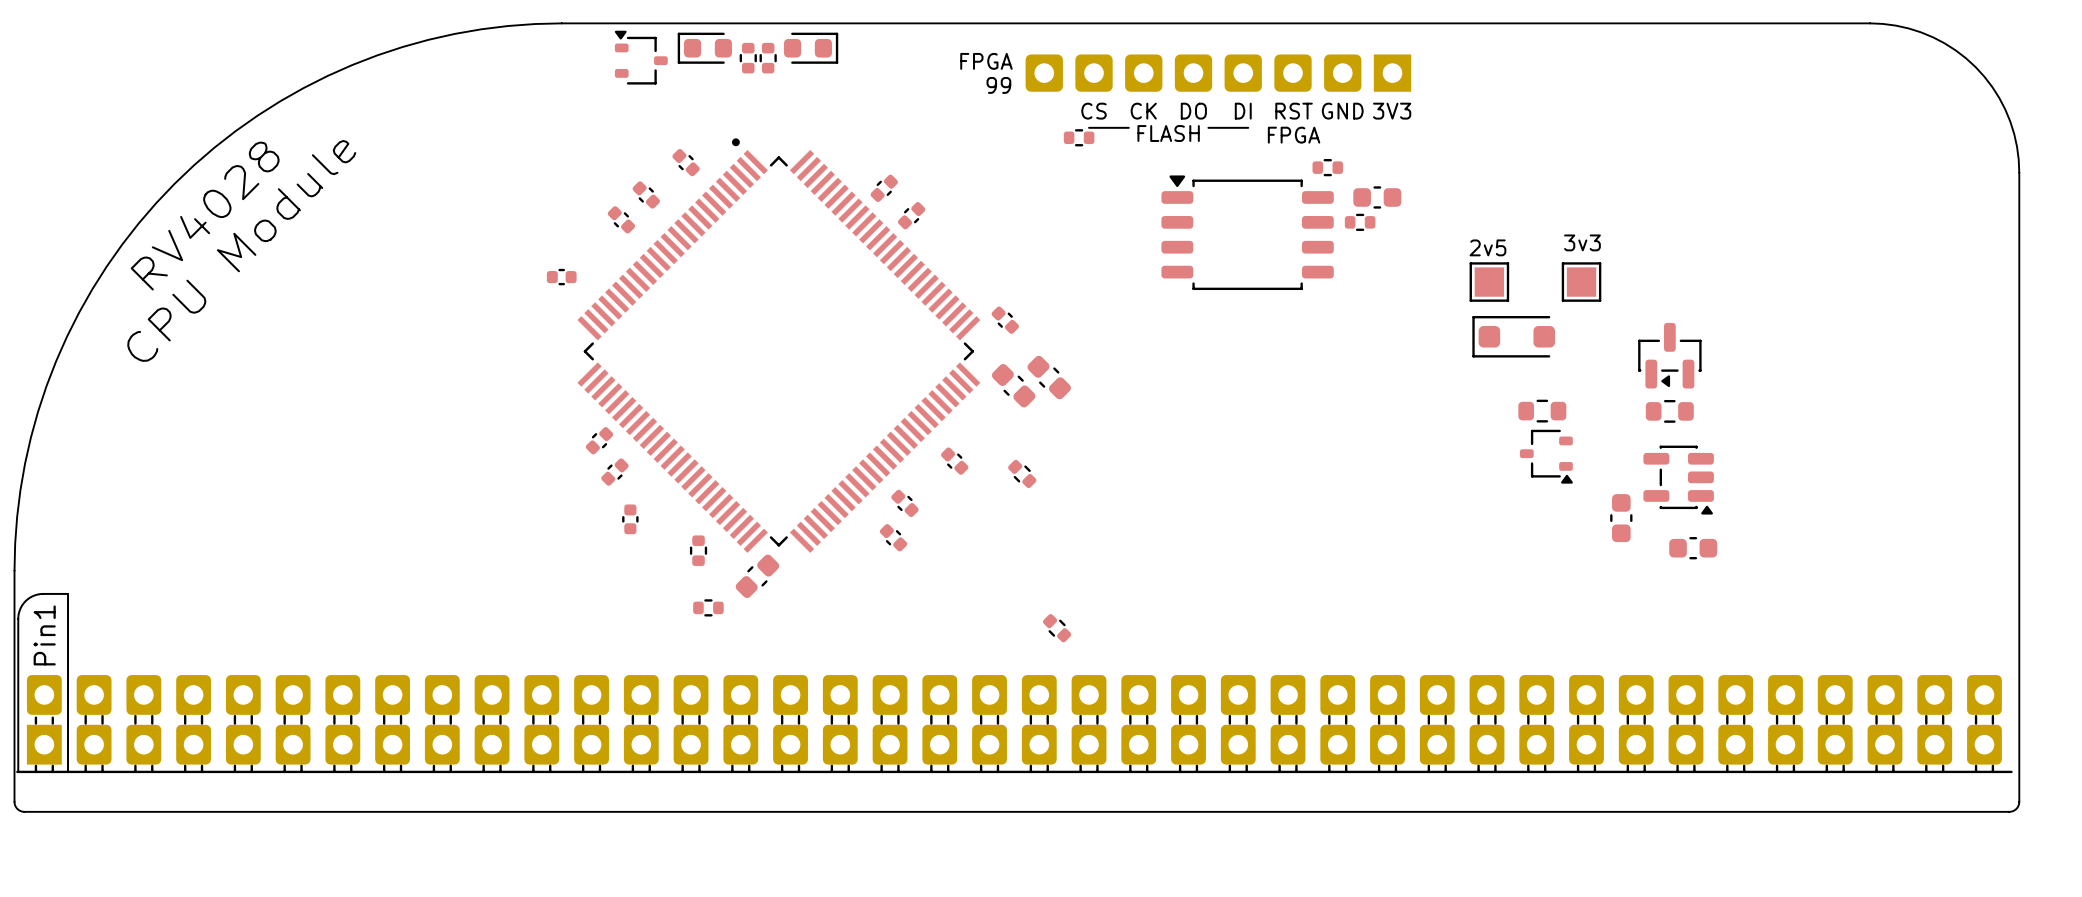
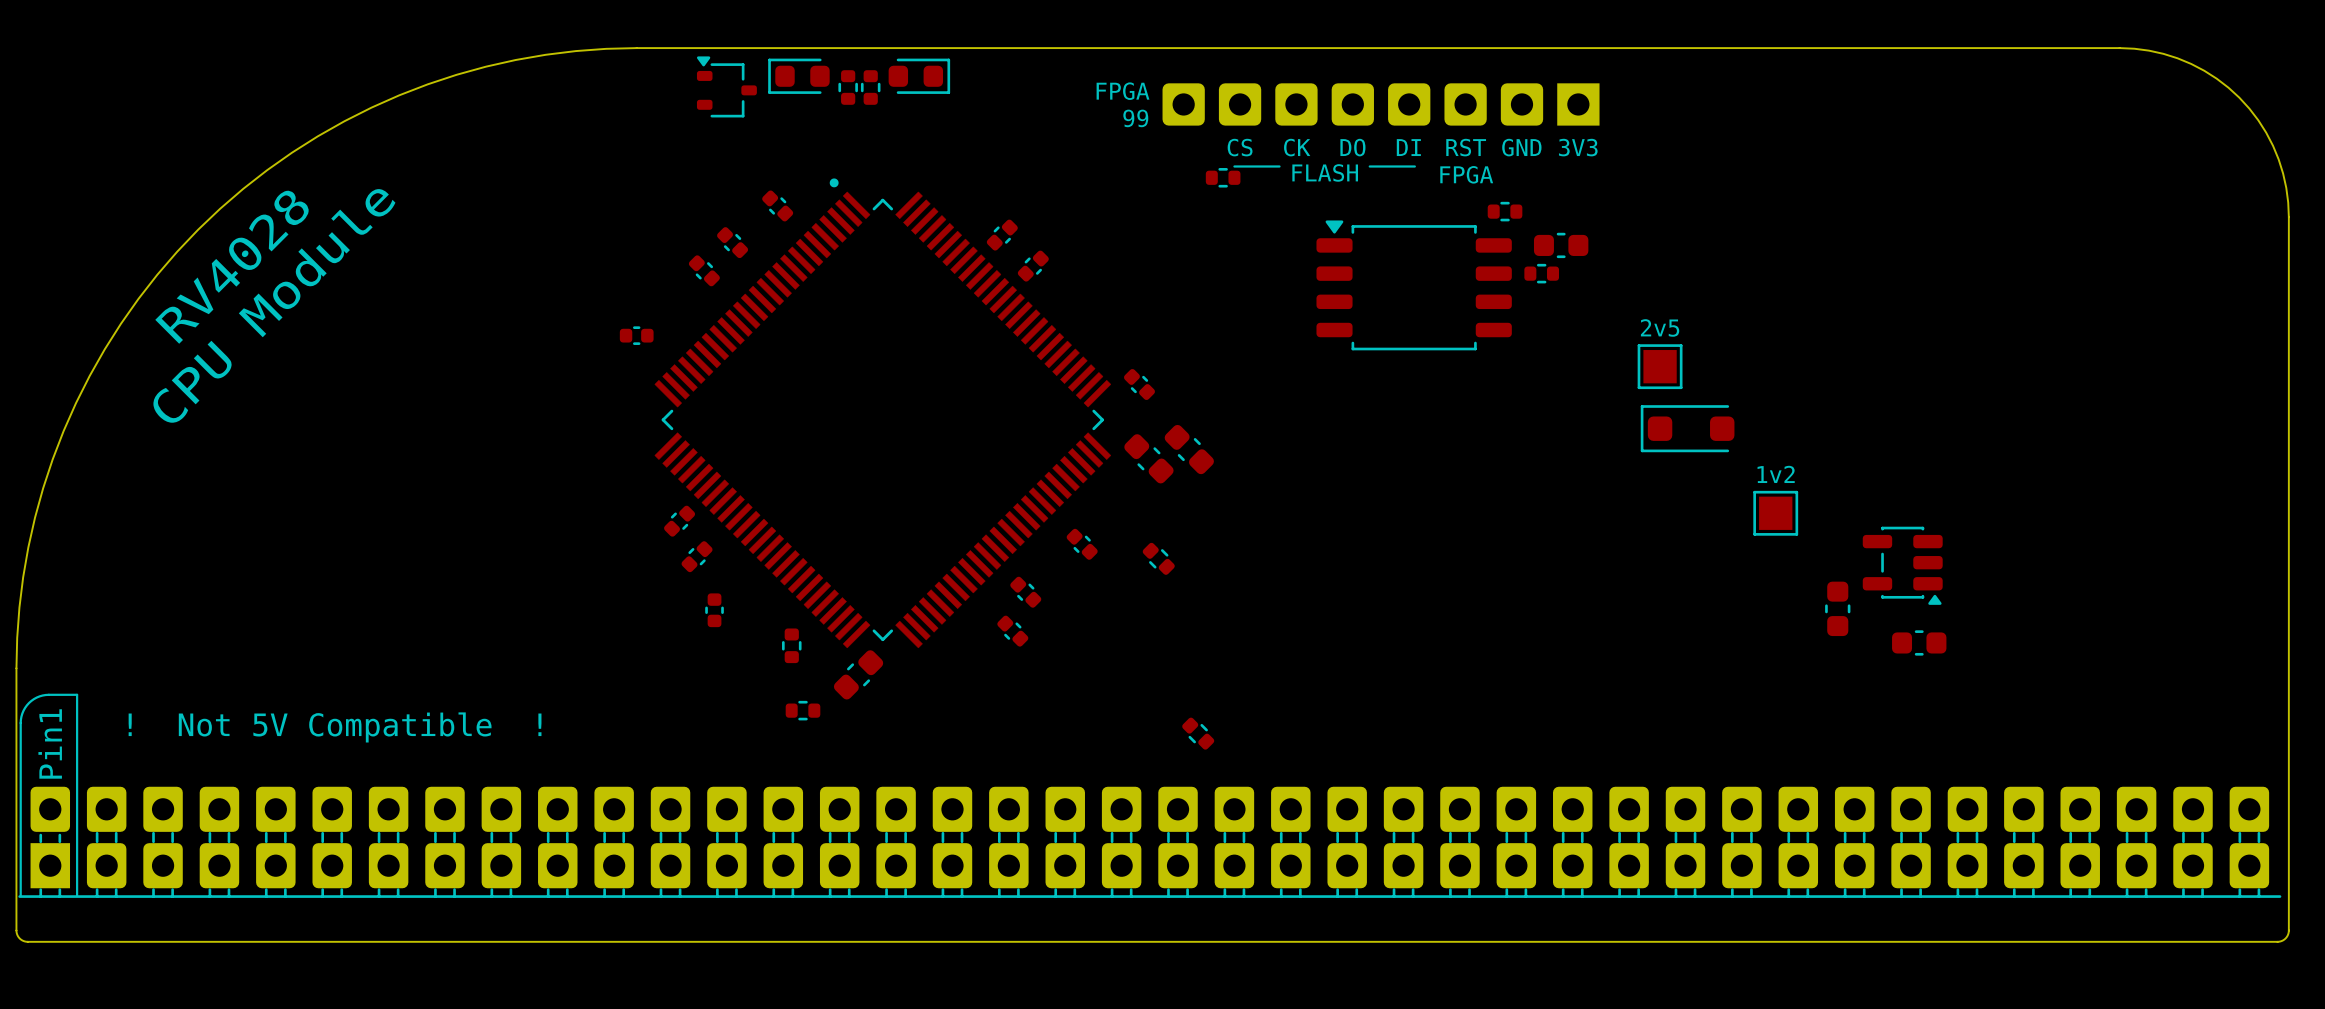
text: 3v3 (1582, 242) -> none
text position: 2v5 (1487, 247) -> 2v5 (1660, 327)
part position: (1489, 282) -> (1660, 366)
part: (1581, 282) -> none
part position: (1513, 336) -> (1687, 428)
part: (1669, 355) -> none
text: none -> 1v2 (1776, 474)
part: (1542, 411) -> none
part: (1669, 411) -> none
part: none -> (1775, 513)
part: (1546, 456) -> none
text: none -> ! Not 5V Compatible ! (335, 727)

